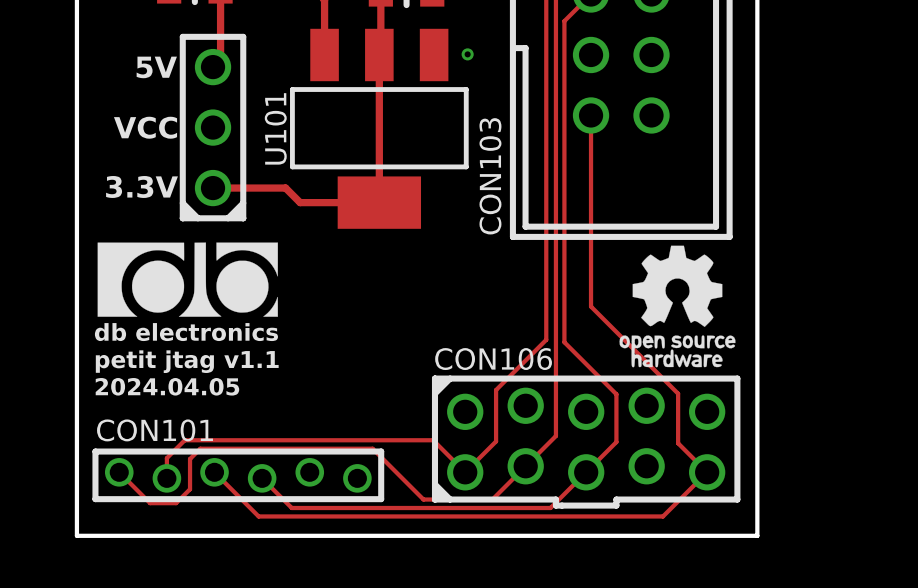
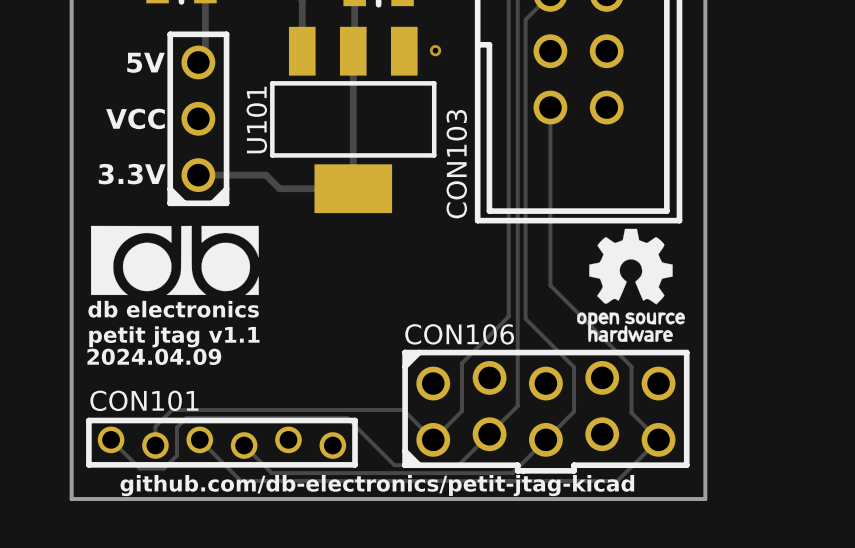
text: 2024.04.05 (167, 386) -> 2024.04.09 (154, 356)
text: none -> github.com/db-electronics/petit-jtag-kicad (377, 485)

